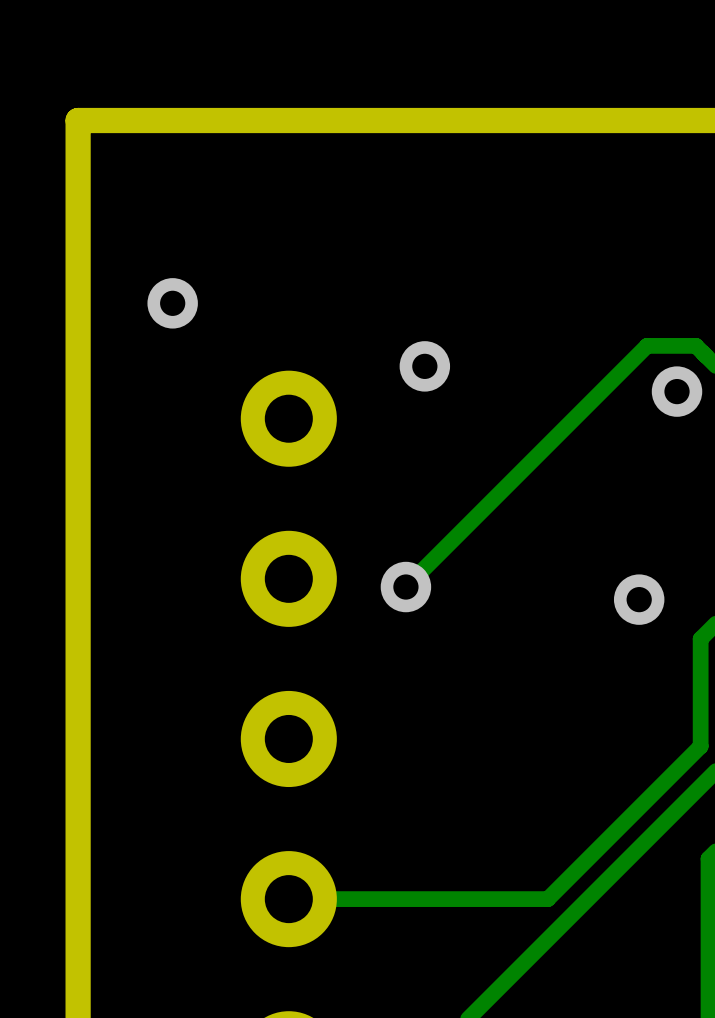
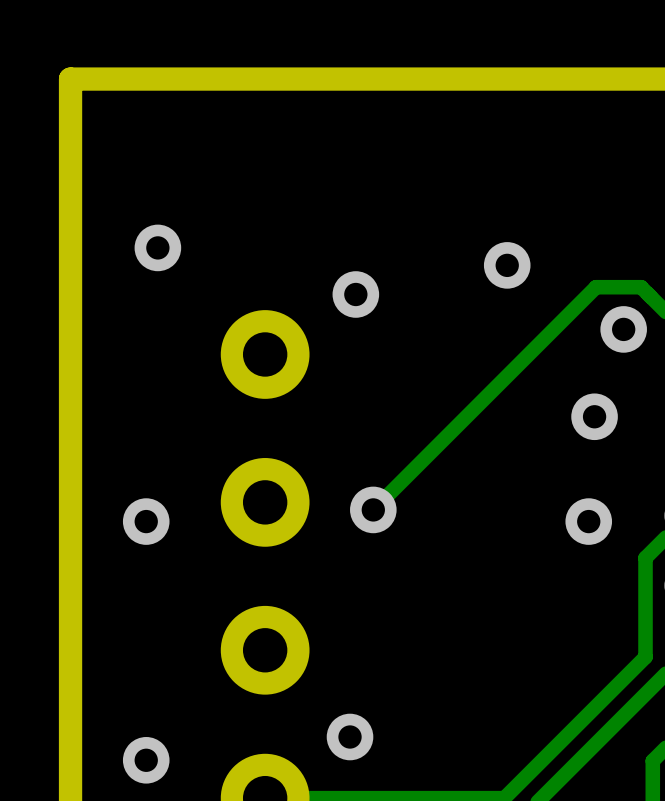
via: none -> (507, 265)
via position: (424, 366) -> (355, 294)
via: none -> (594, 416)
via: none -> (146, 521)
via: none -> (350, 737)
via: none -> (146, 760)

